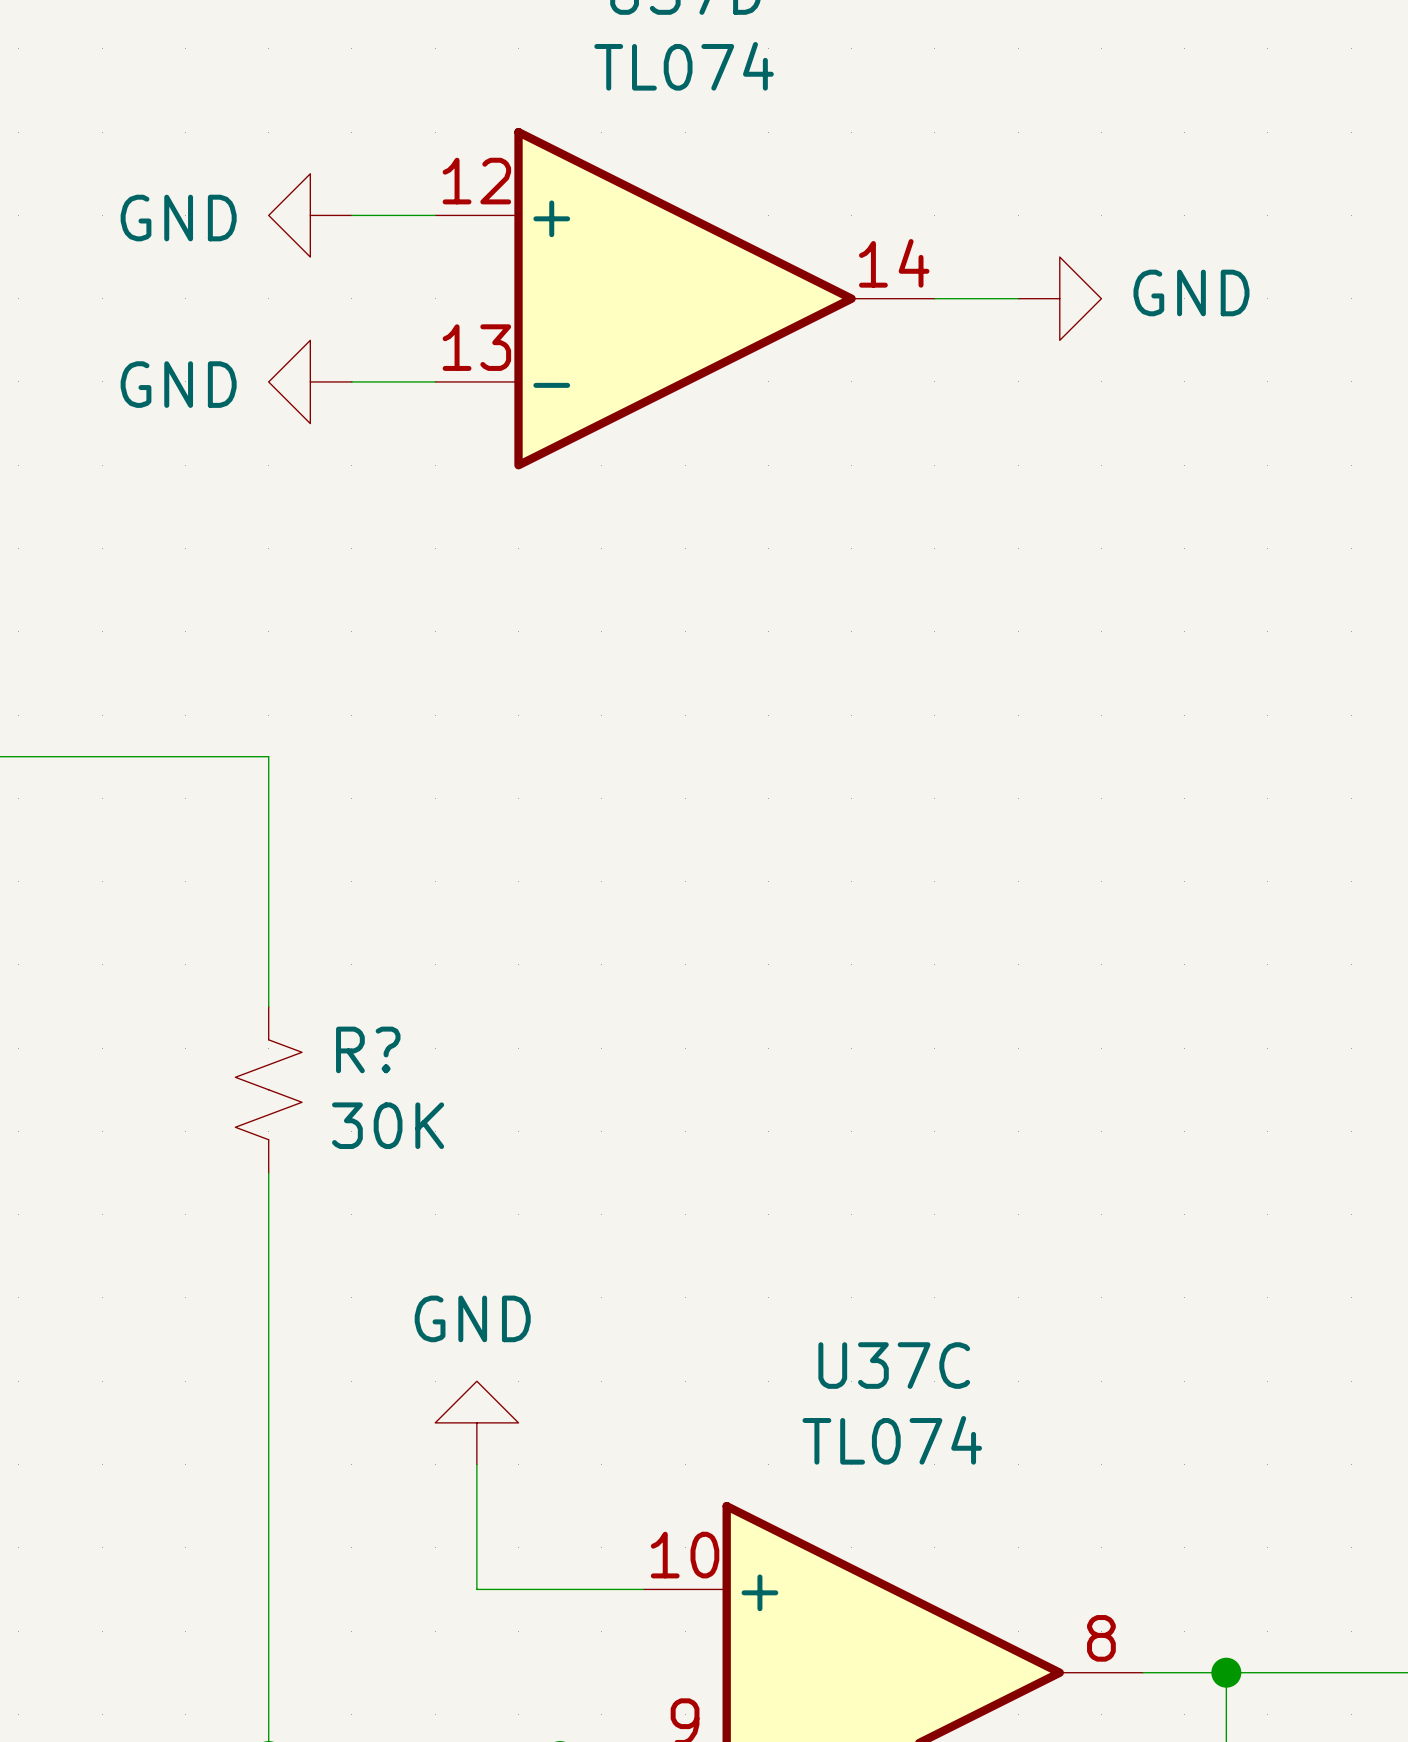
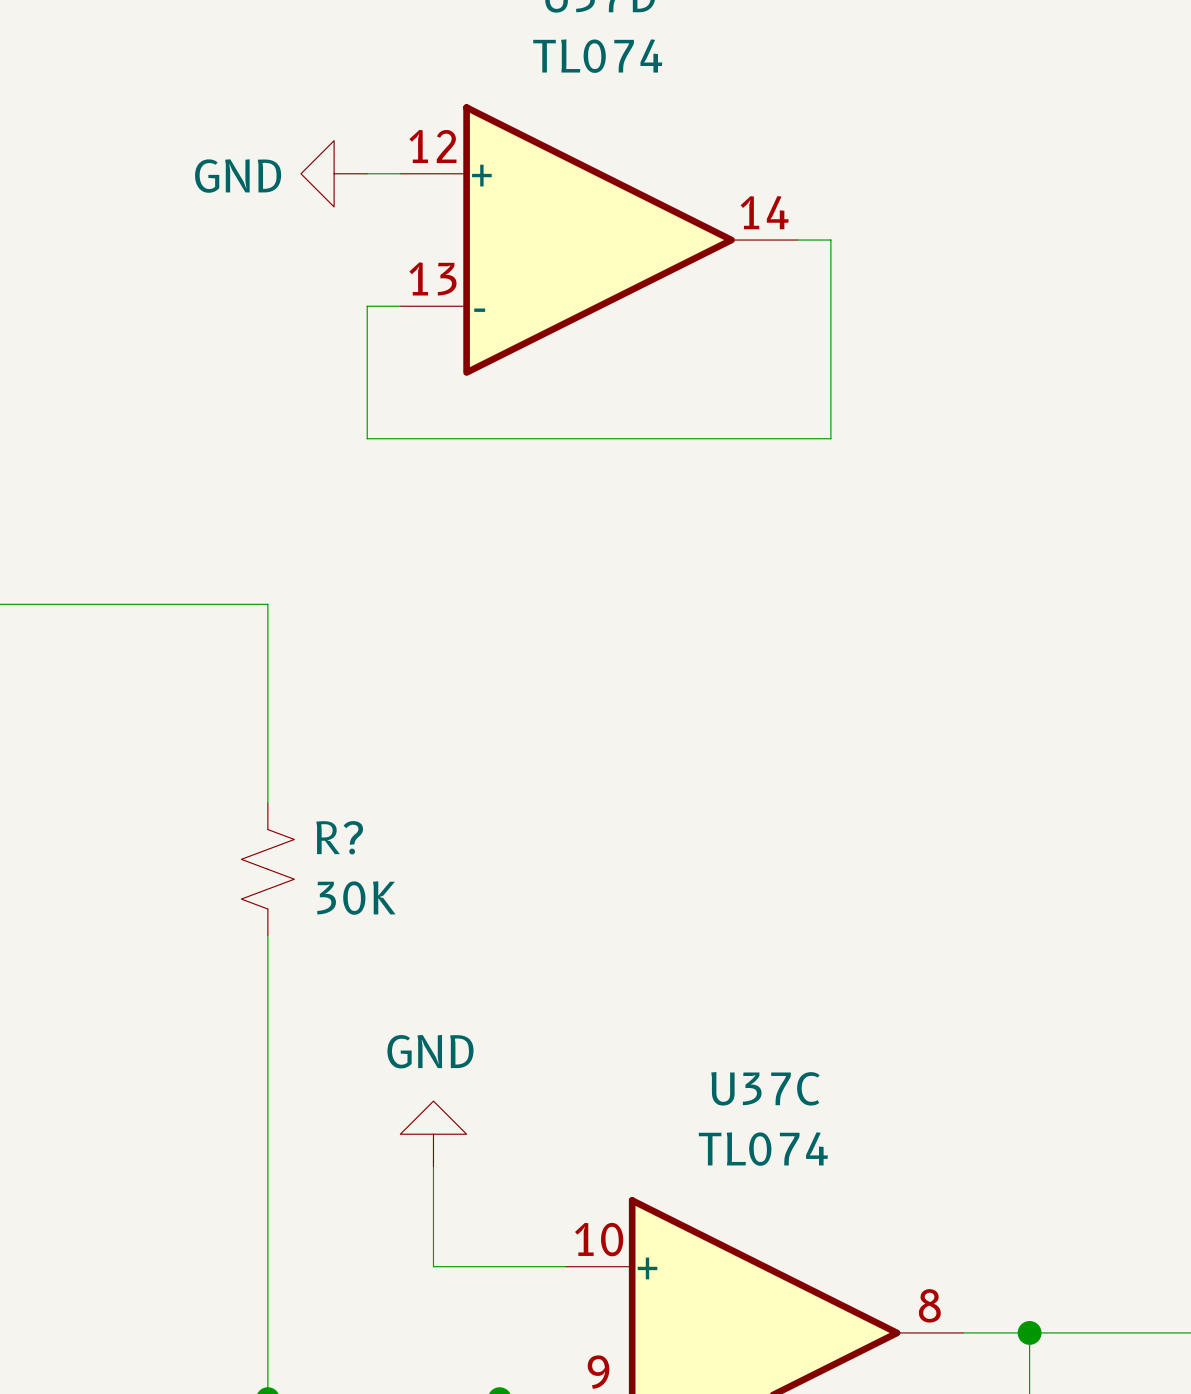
power symbol position: GND (310, 215) -> GND (334, 173)
wire: (976, 298) (1018, 298) -> (830, 240) (830, 438) (367, 438) (367, 306)
power symbol: GND (1059, 298) -> none
power symbol: GND (310, 381) -> none
wire: (351, 381) (393, 381) -> none

